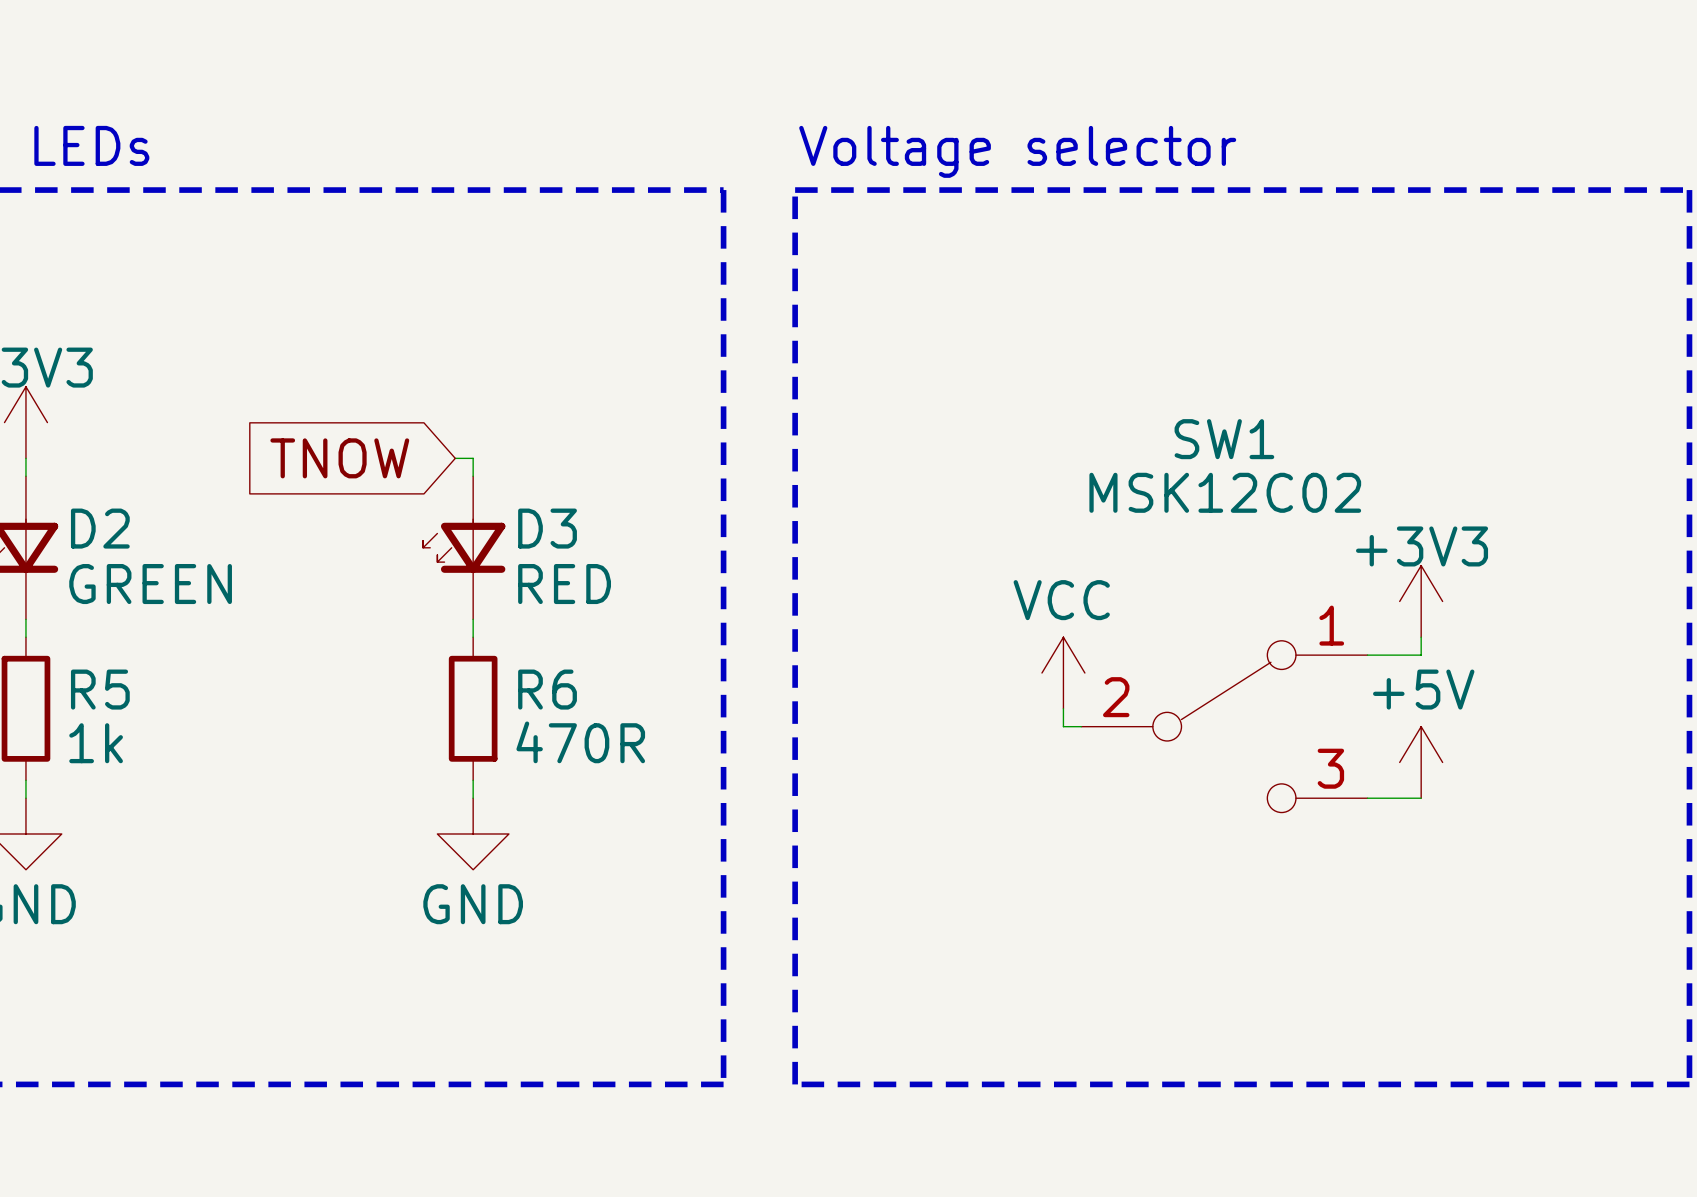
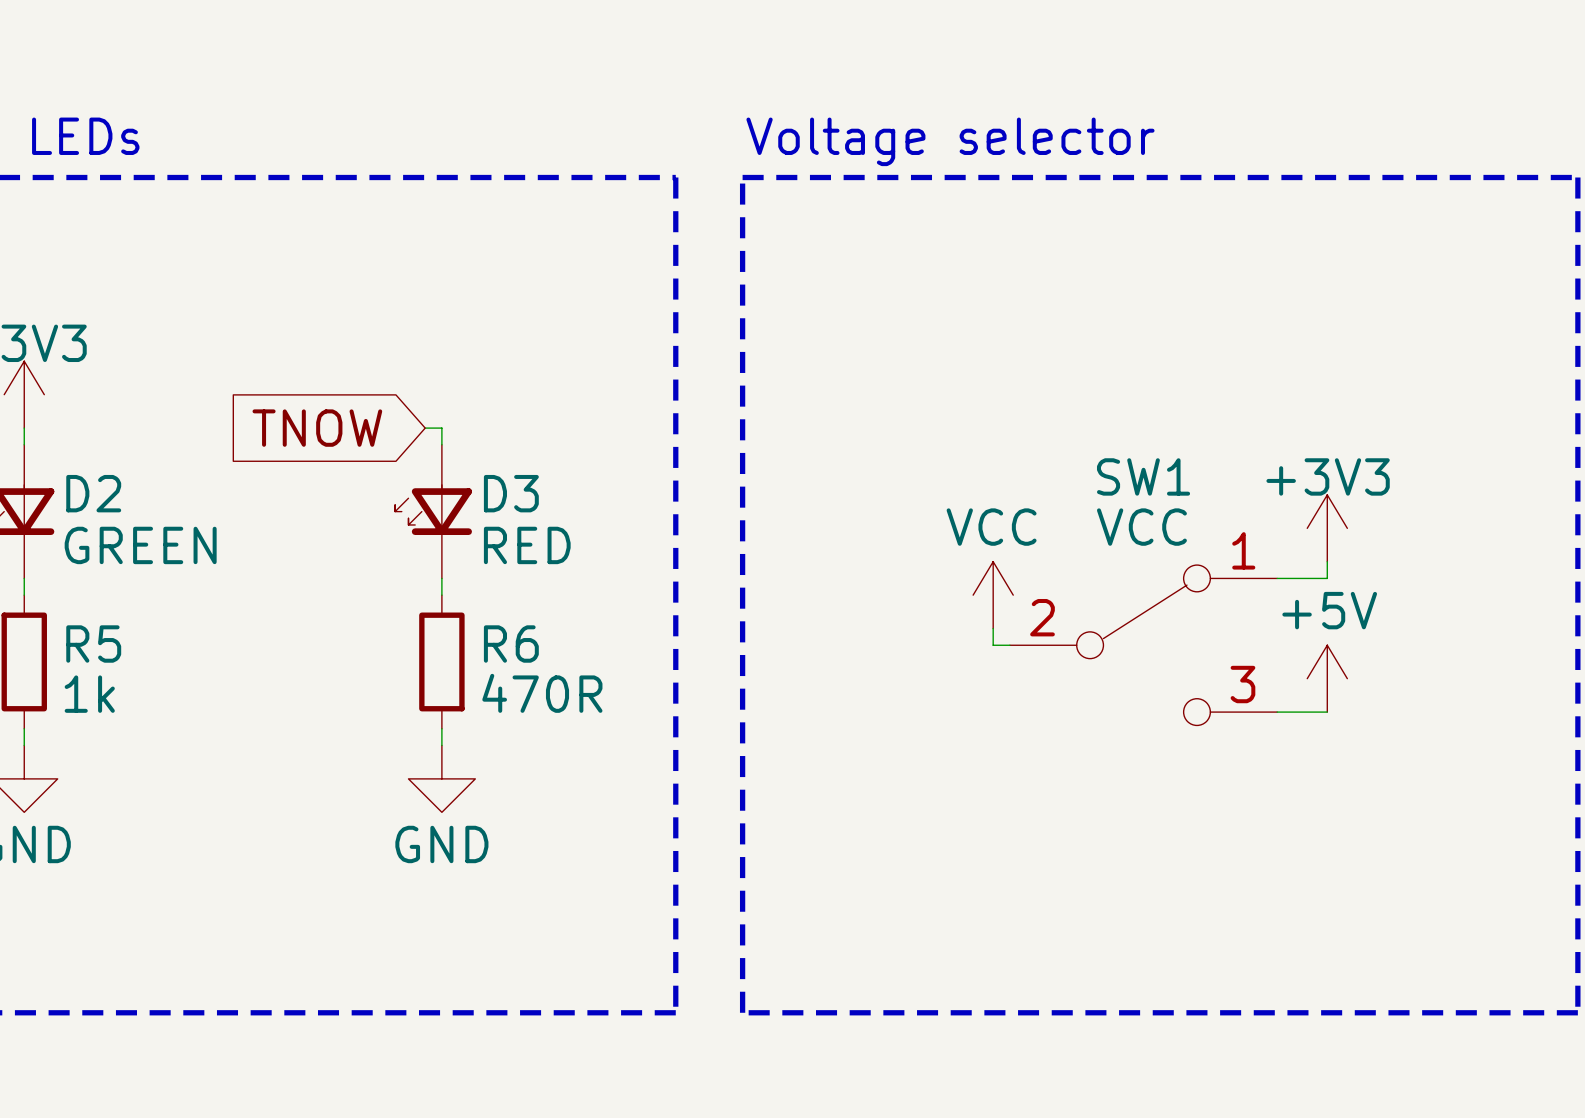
SW1 name position: SW1 (1224, 439) -> SW1 (1143, 476)
SW1 value: MSK12C02 (1225, 492) -> VCC (1141, 527)
power symbol position: +3V3 (1421, 601) -> +3V3 (1327, 528)
wire: (1421, 637) (1421, 655) (1367, 655) -> (1327, 561) (1327, 578) (1277, 578)
power symbol position: VCC (1063, 673) -> VCC (993, 595)
wire: (1063, 708) (1063, 726) (1081, 726) -> (993, 628) (993, 645) (1009, 645)
SW1 position: (1224, 726) -> (1143, 645)
power symbol position: +5V (1421, 762) -> +5V (1327, 678)
wire: (1367, 798) (1421, 798) -> (1277, 712) (1327, 712)

